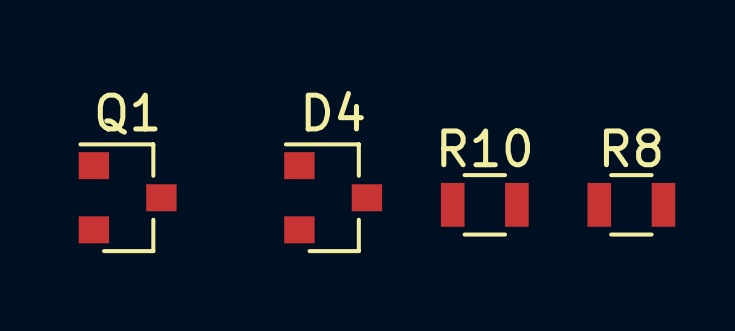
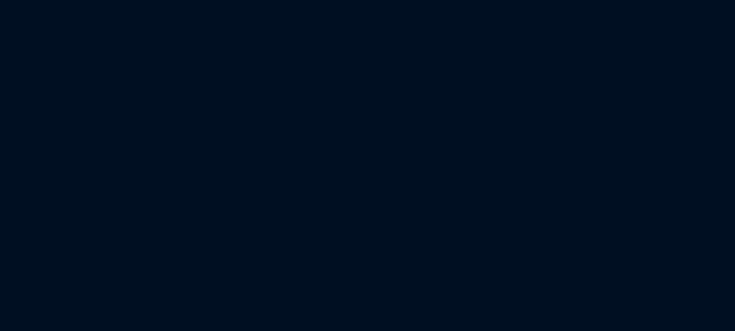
Q1: (127, 197) -> none
D4: (332, 197) -> none
R10: (484, 204) -> none
R8: (631, 204) -> none

